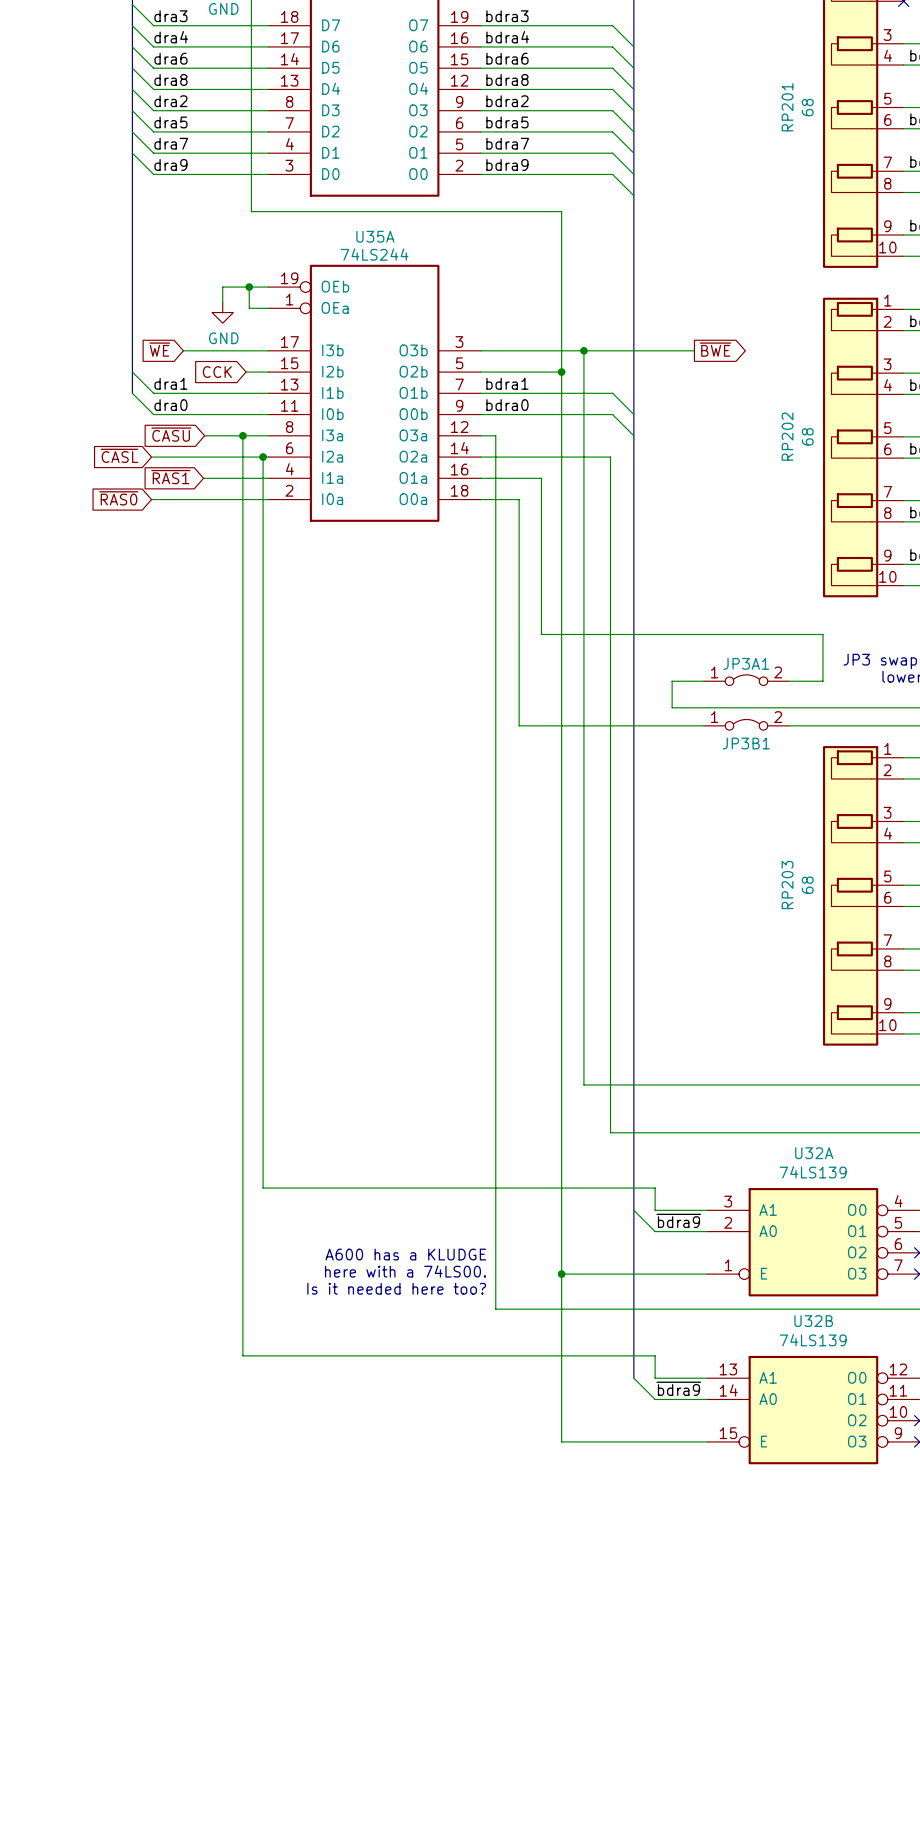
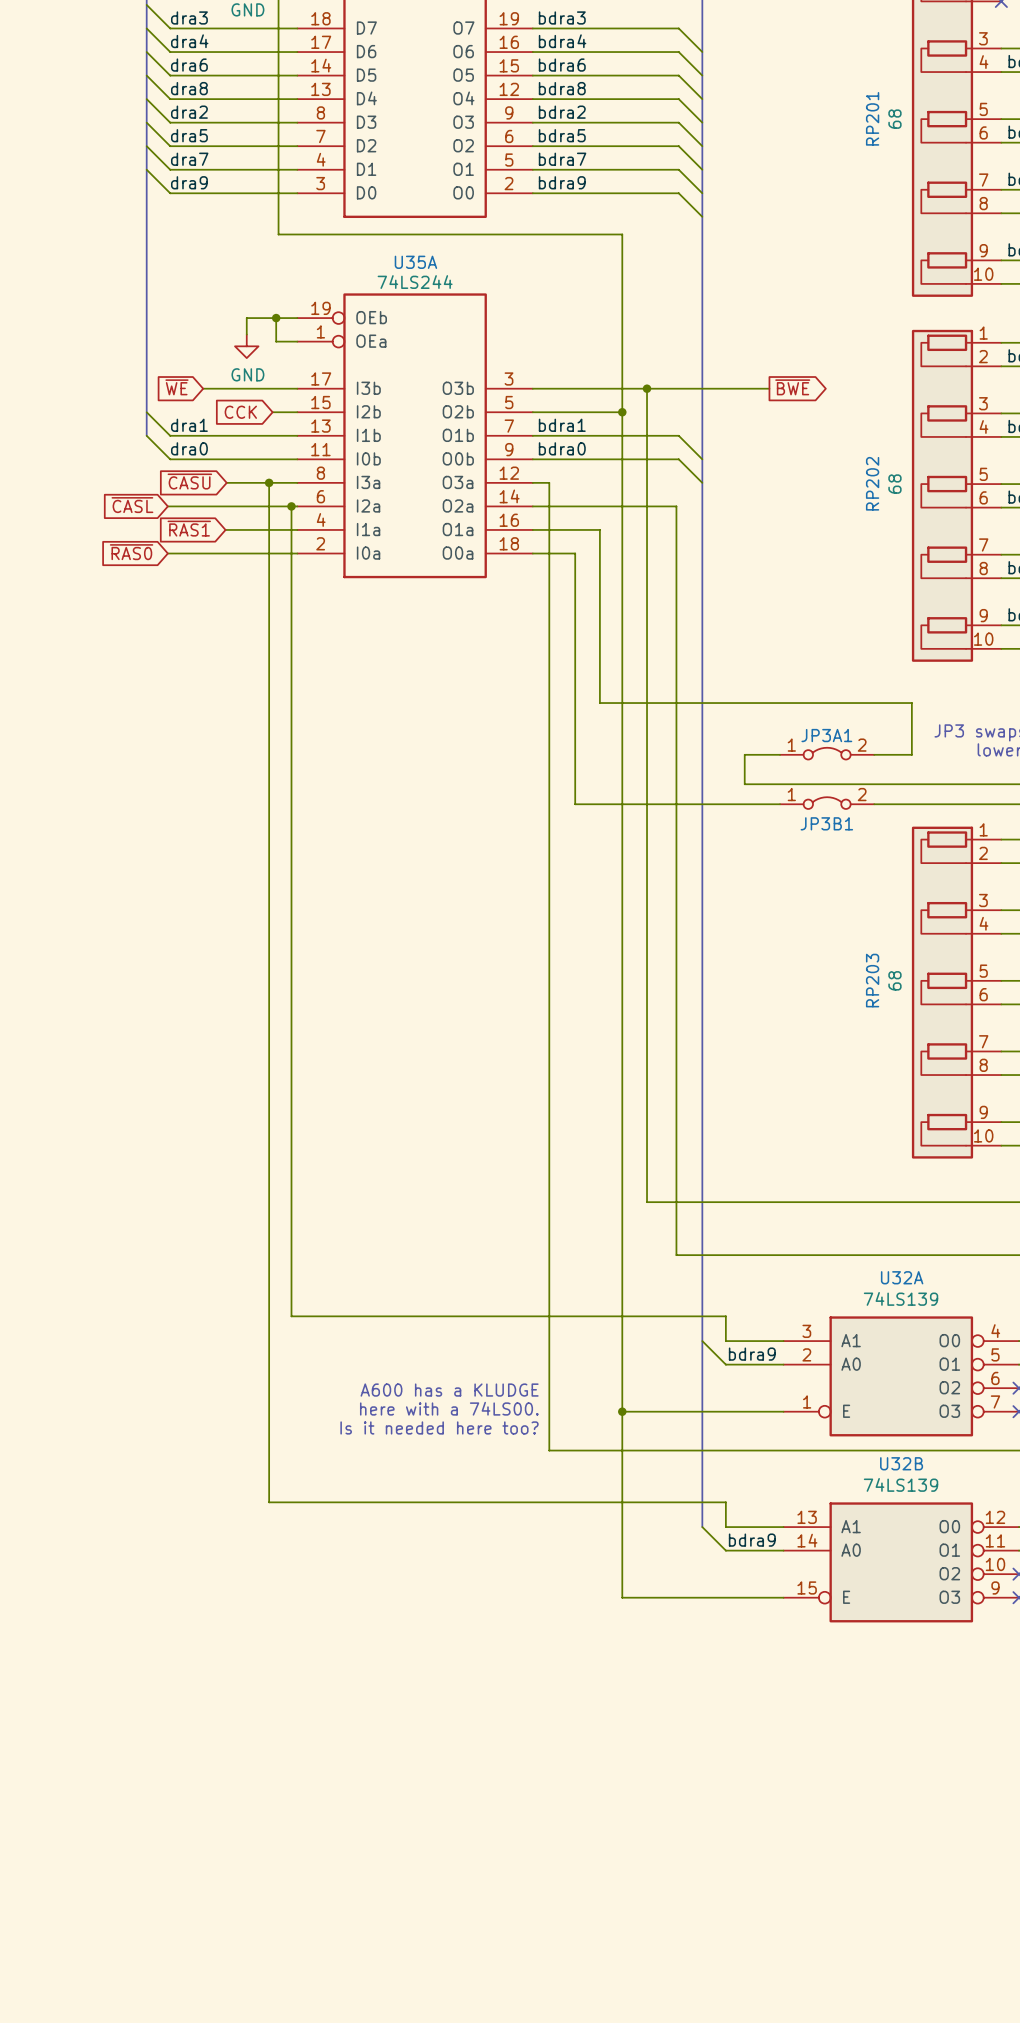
label: ~{bdra9} (678, 1220) -> bdra9 (752, 1354)
label: ~{bdra9} (678, 1388) -> bdra9 (752, 1540)

